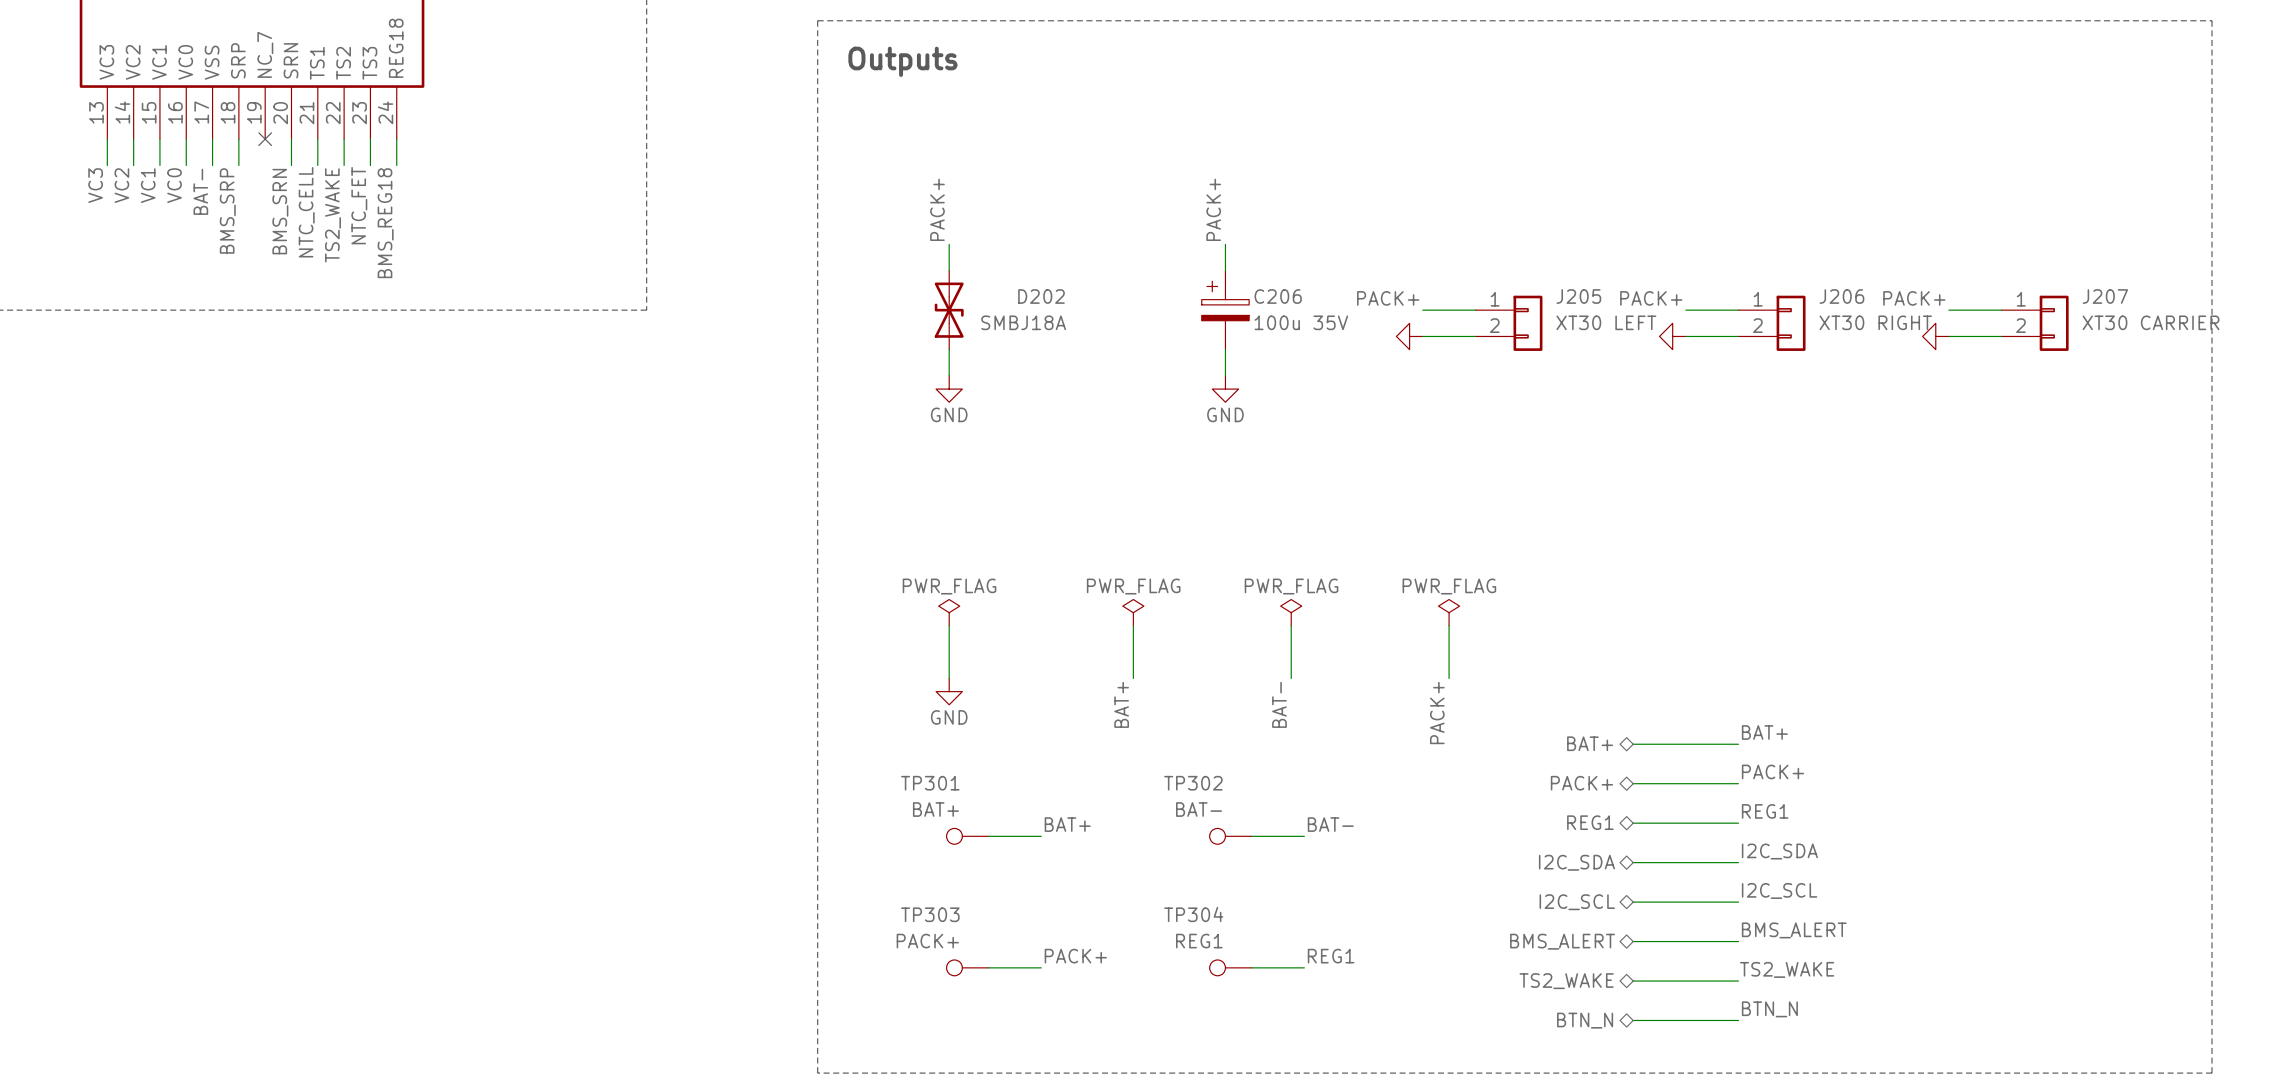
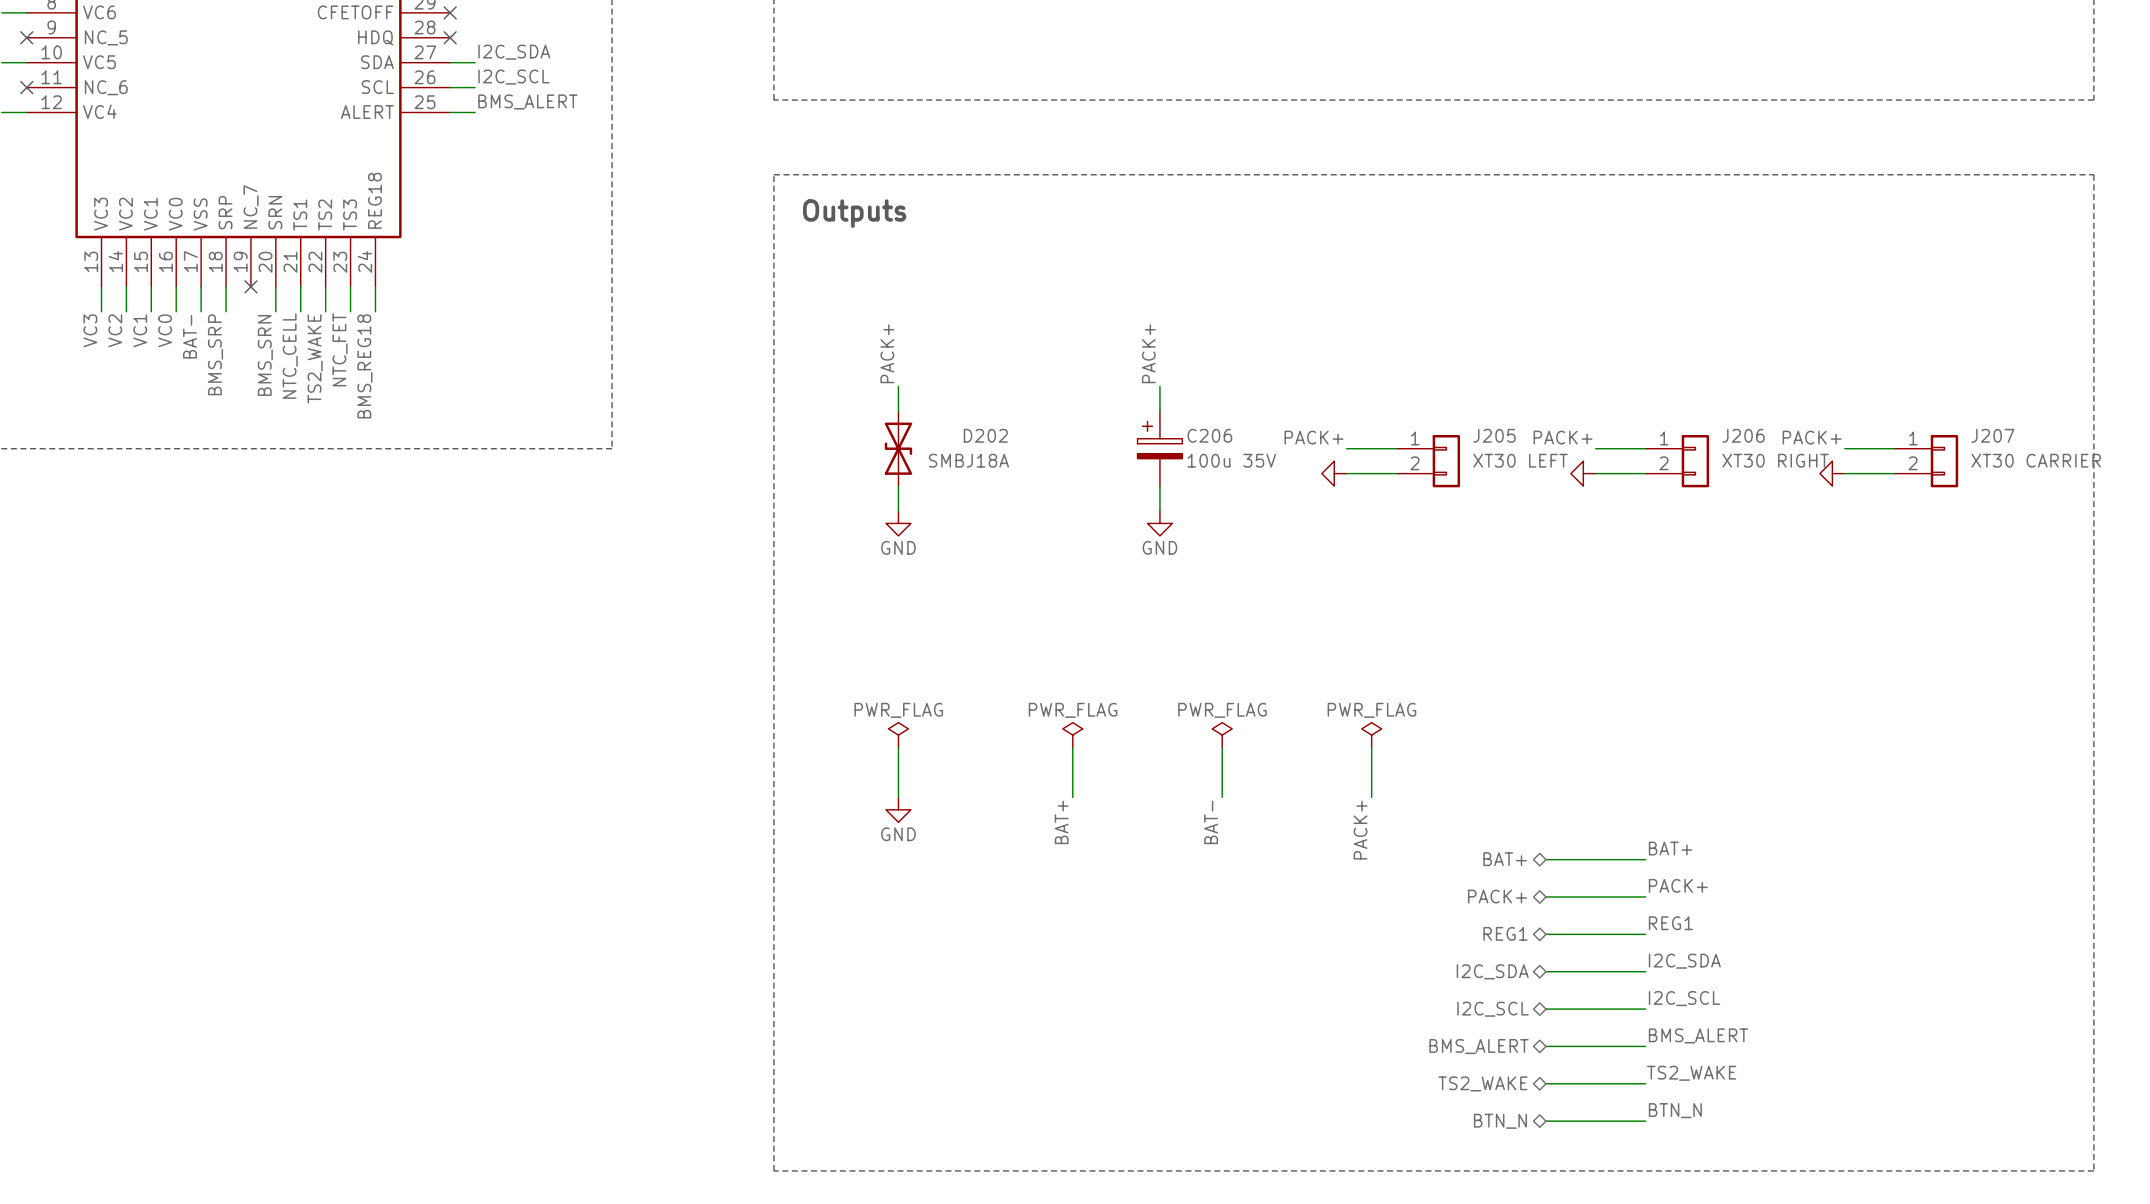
label: BAT+ (1067, 824) -> none
label: BAT- (1330, 824) -> none
TP301: BAT+ (967, 836) -> none
wire: (988, 836) (1041, 836) -> none
TP302: BAT- (1230, 836) -> none
wire: (1251, 836) (1304, 836) -> none
label: PACK+ (1075, 956) -> none
label: REG1 (1331, 956) -> none
TP303: PACK+ (967, 967) -> none
wire: (988, 967) (1041, 967) -> none
TP304: REG1 (1230, 967) -> none
wire: (1251, 967) (1304, 967) -> none

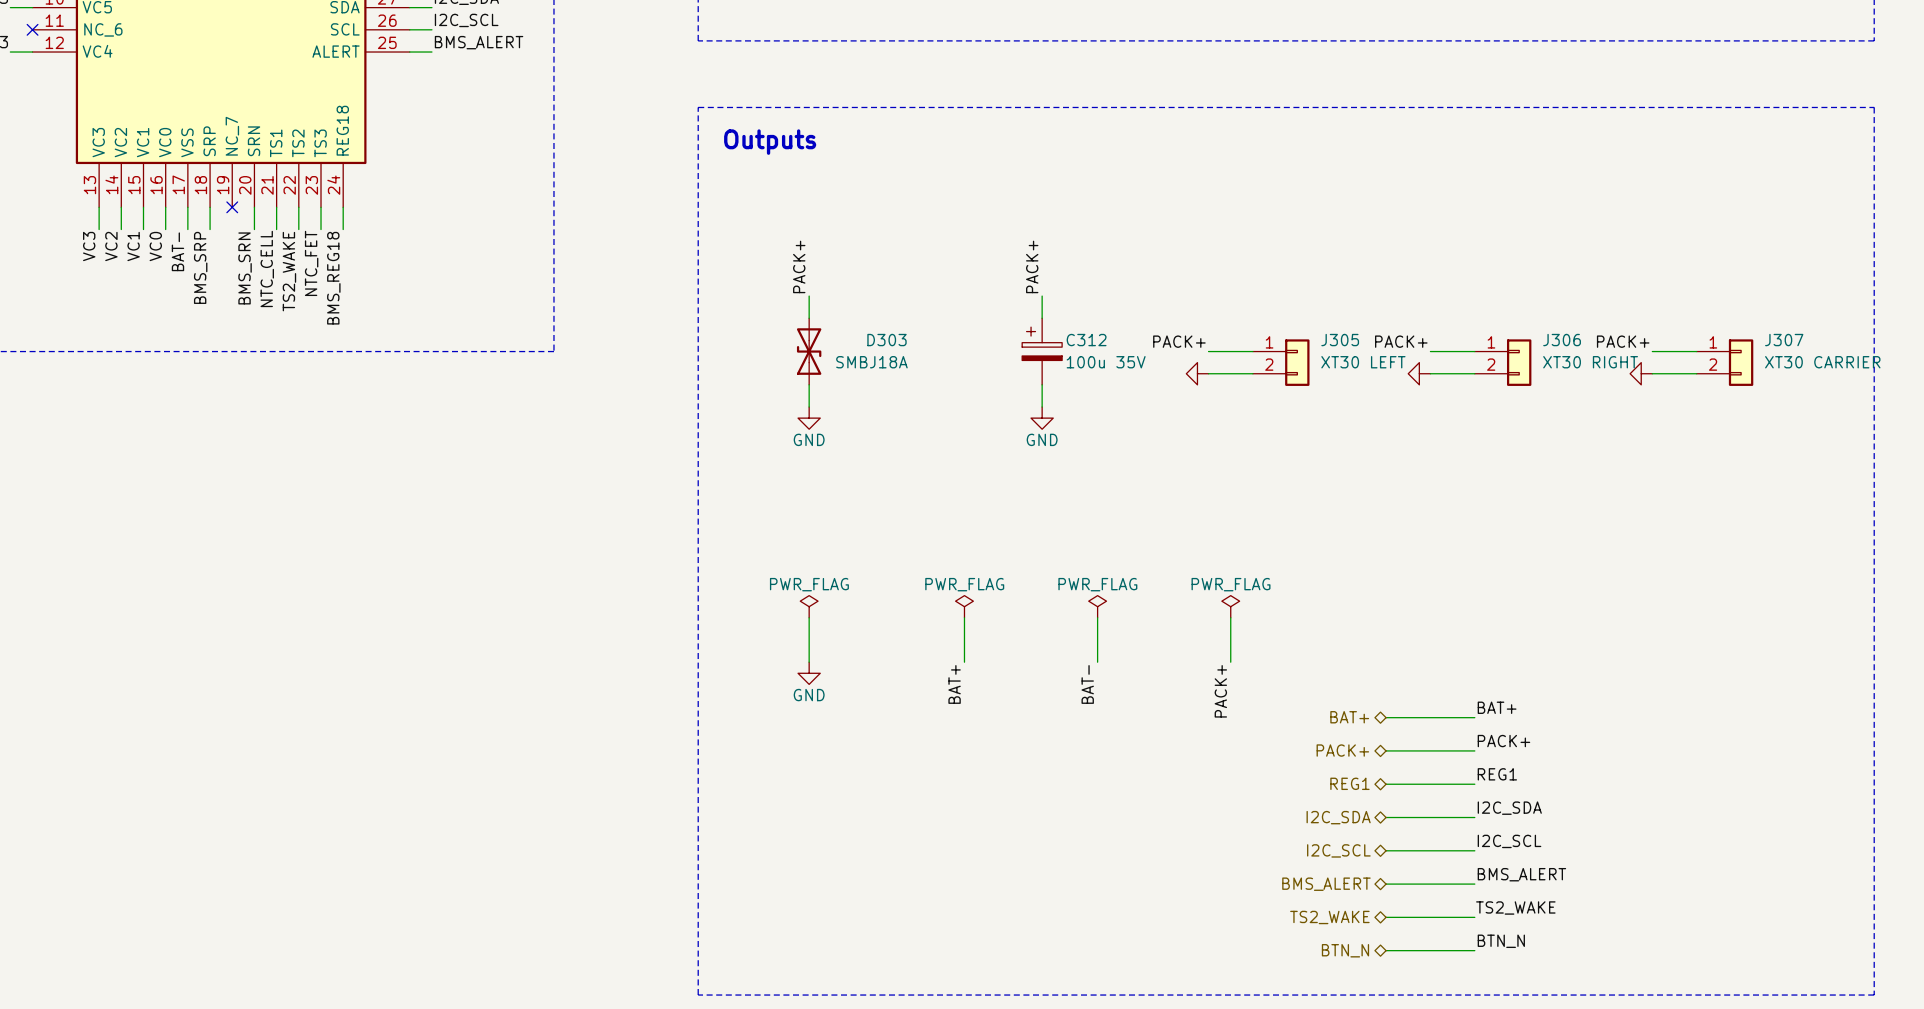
D202 name: D202 (985, 435) -> D303 (886, 340)
C206 name: C206 (1209, 435) -> C312 (1086, 340)
J205 name: J205 (1494, 435) -> J305 (1340, 340)
J206 name: J206 (1743, 435) -> J306 (1562, 340)
J207 name: J207 (1992, 435) -> J307 (1784, 340)

